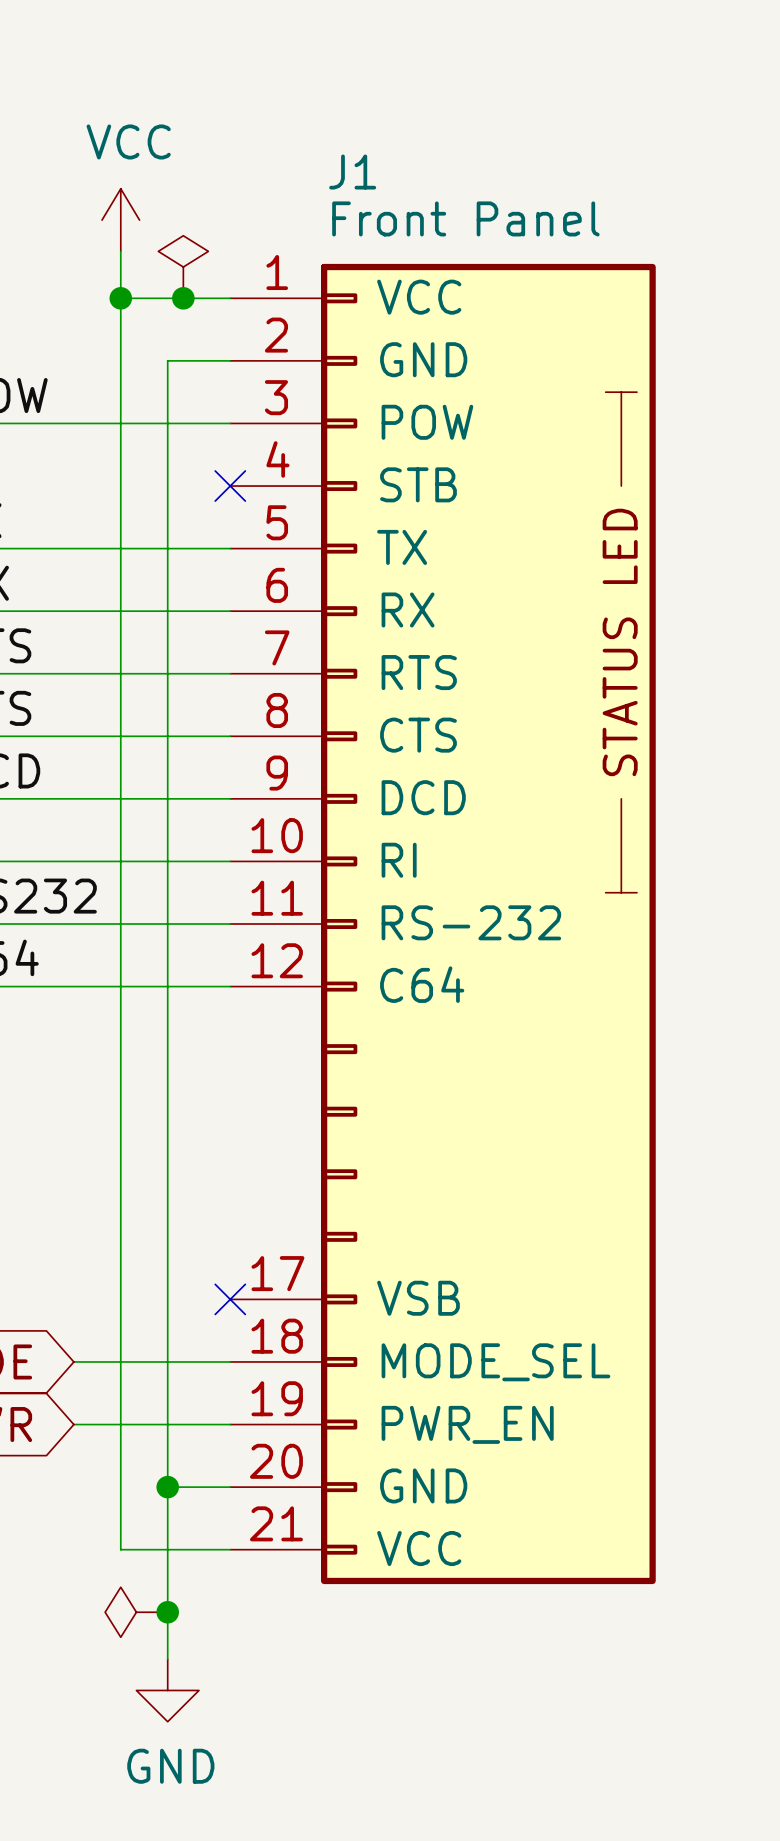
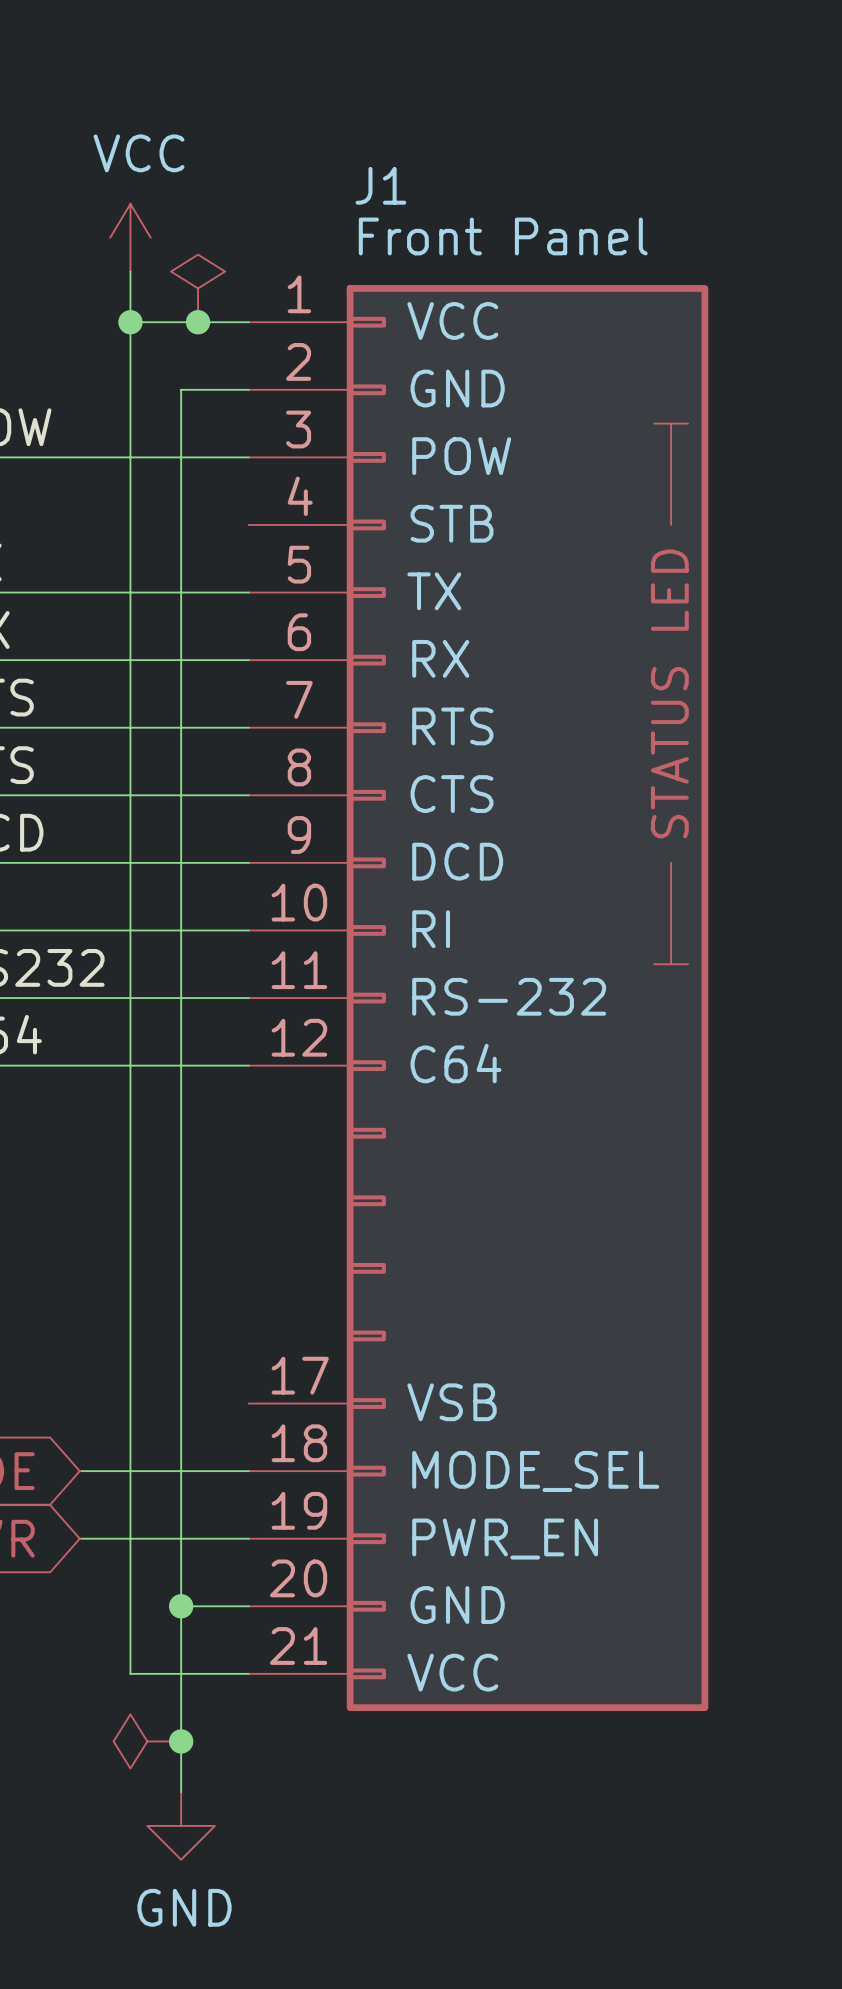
no-connect mark: (230, 486) -> none
no-connect mark: (230, 1299) -> none

